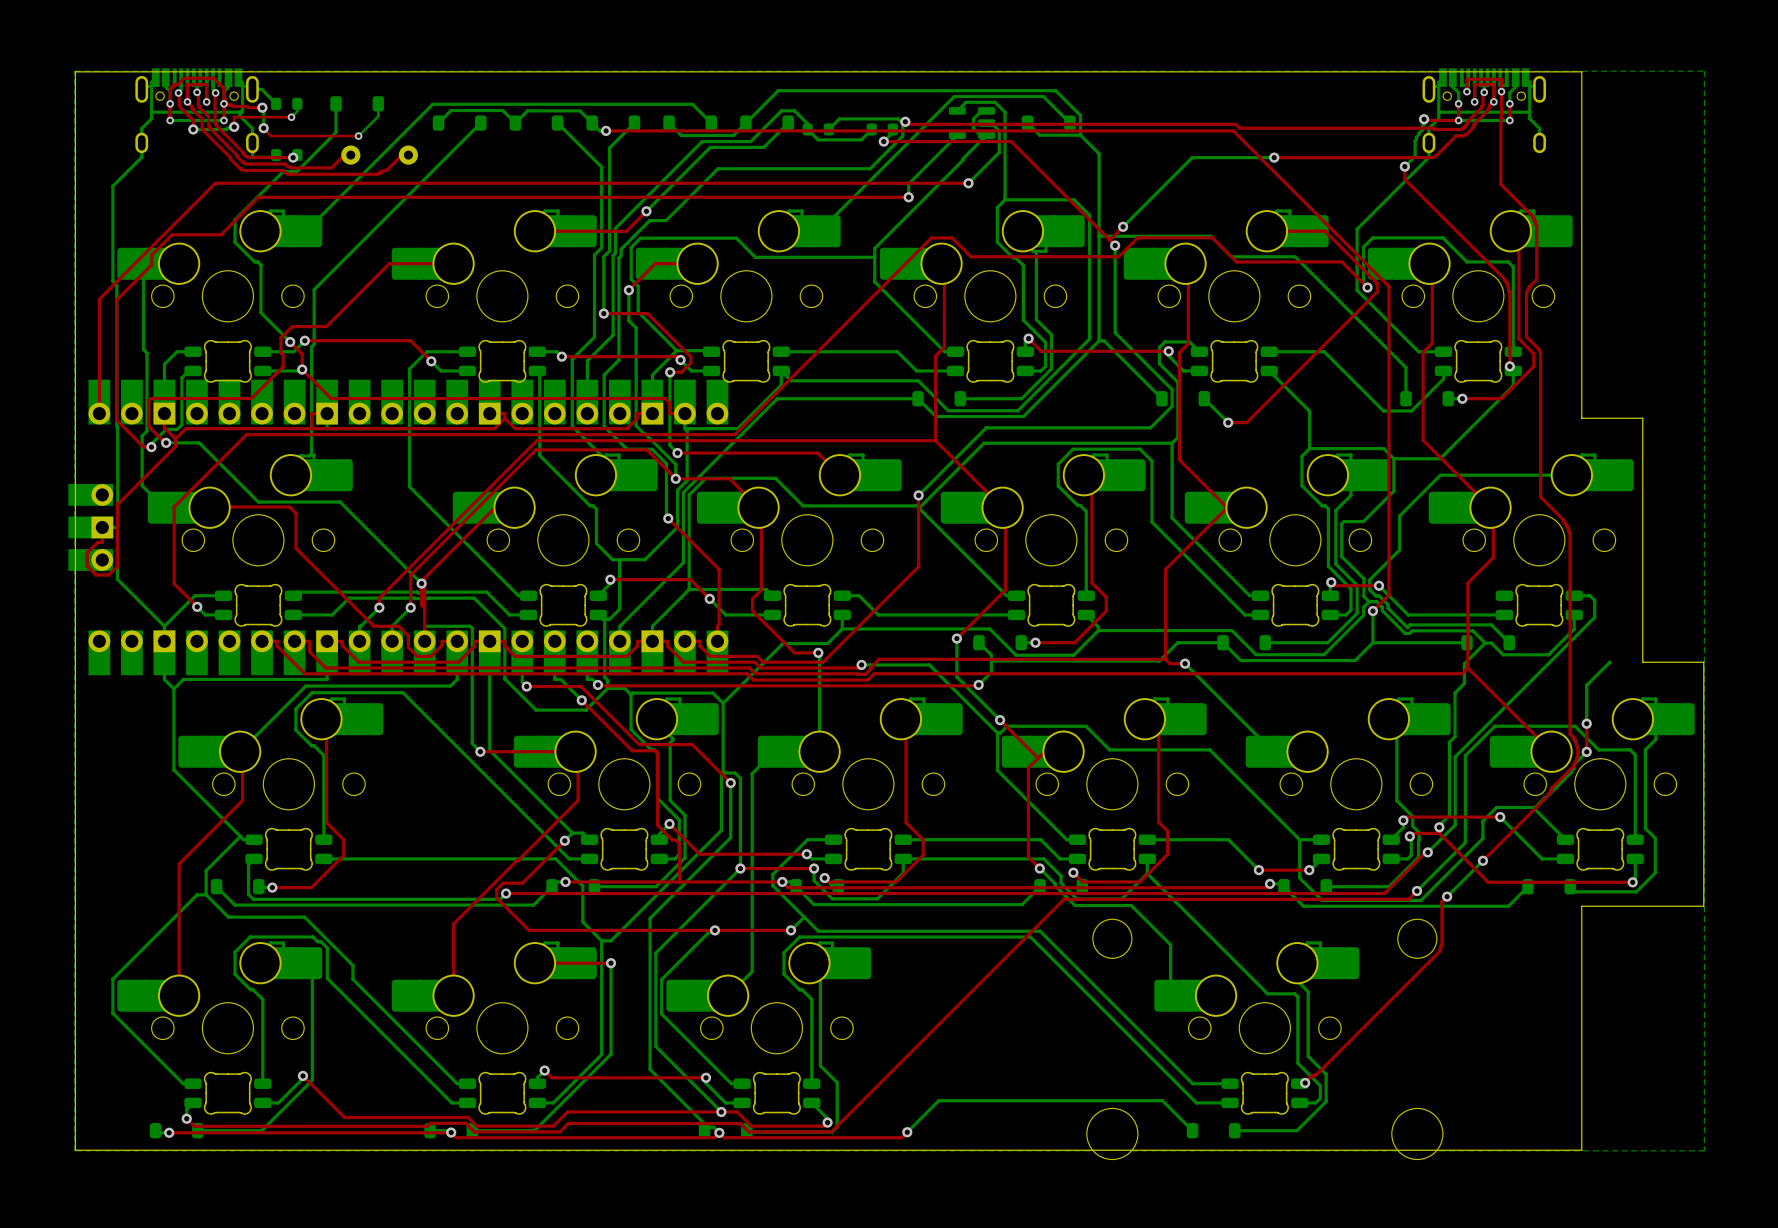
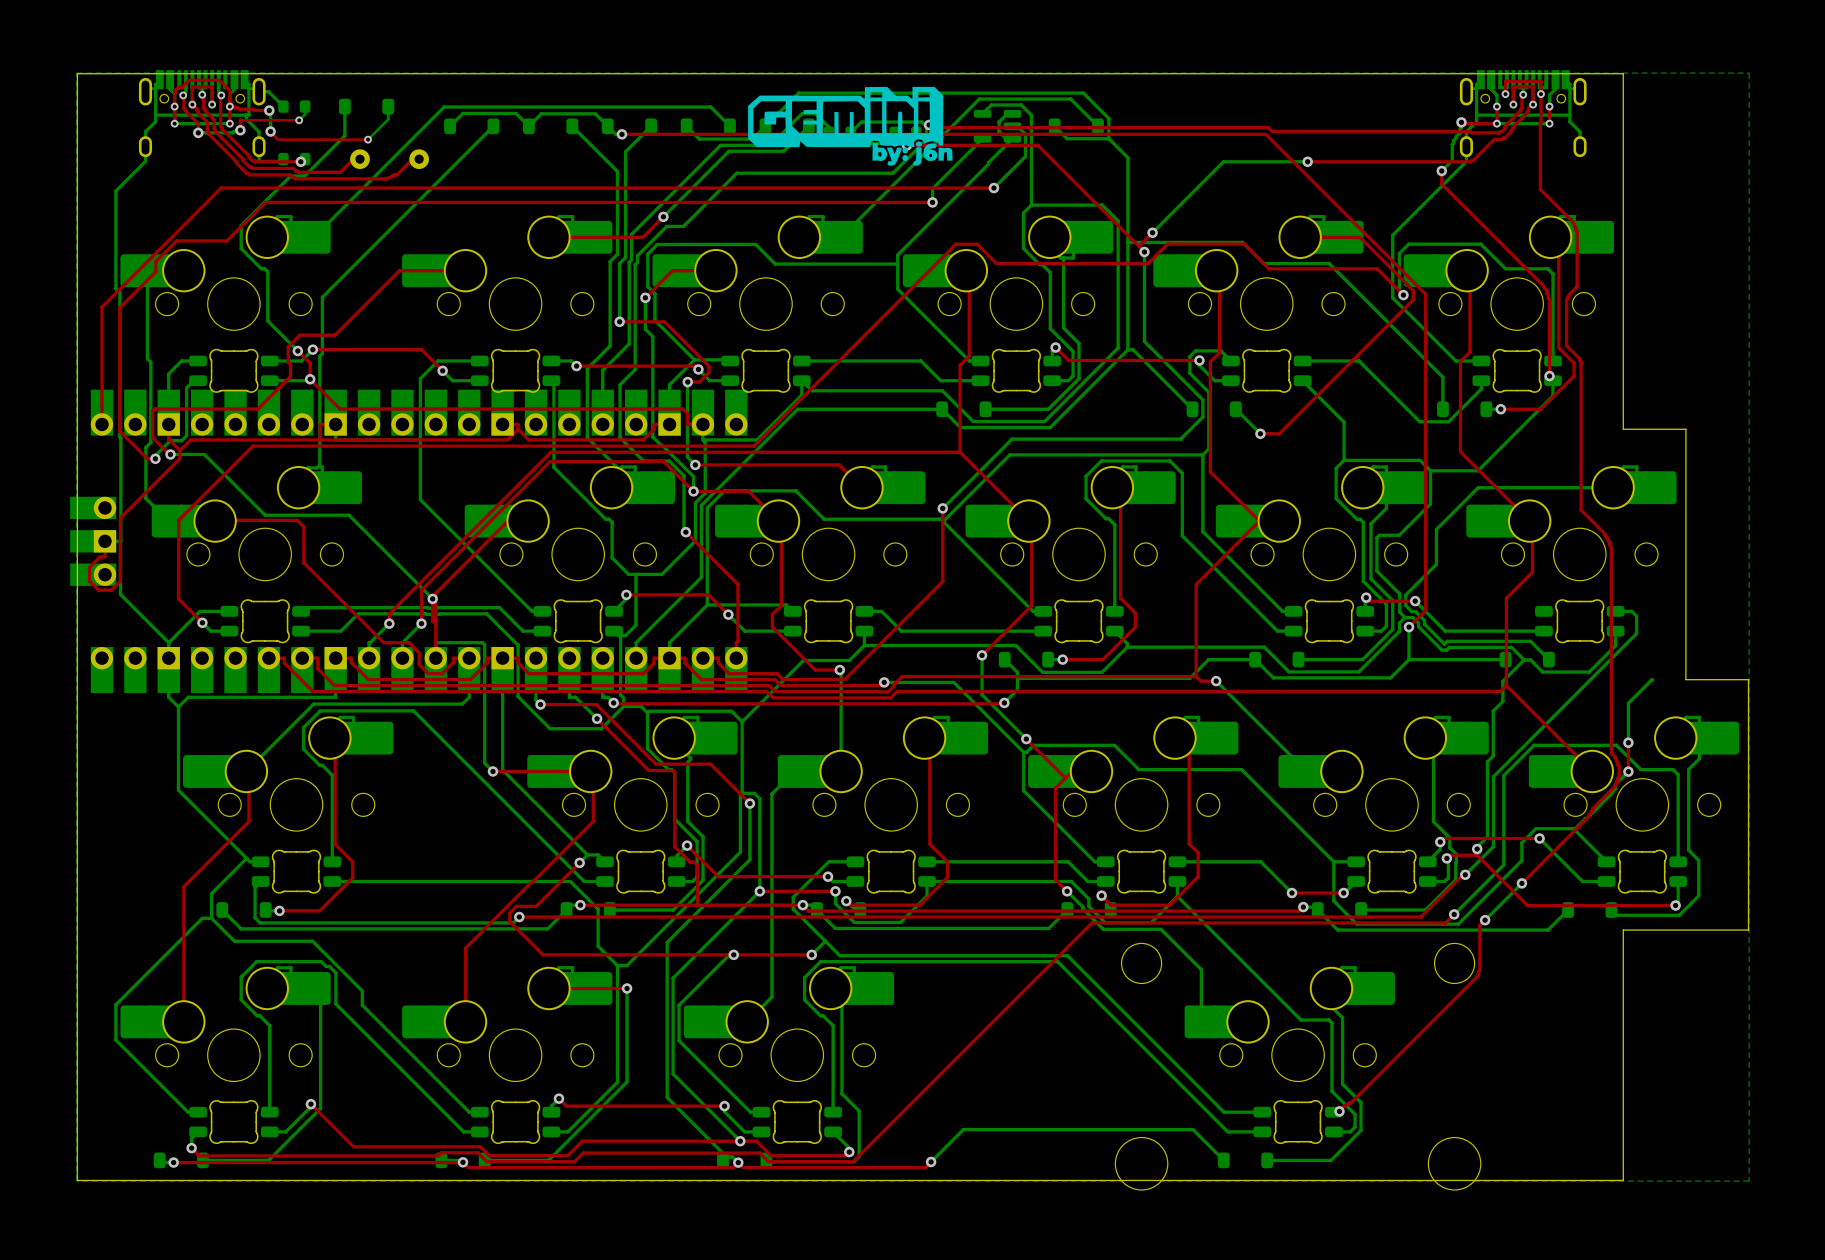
drawing: none -> [748, 86, 953, 166]

